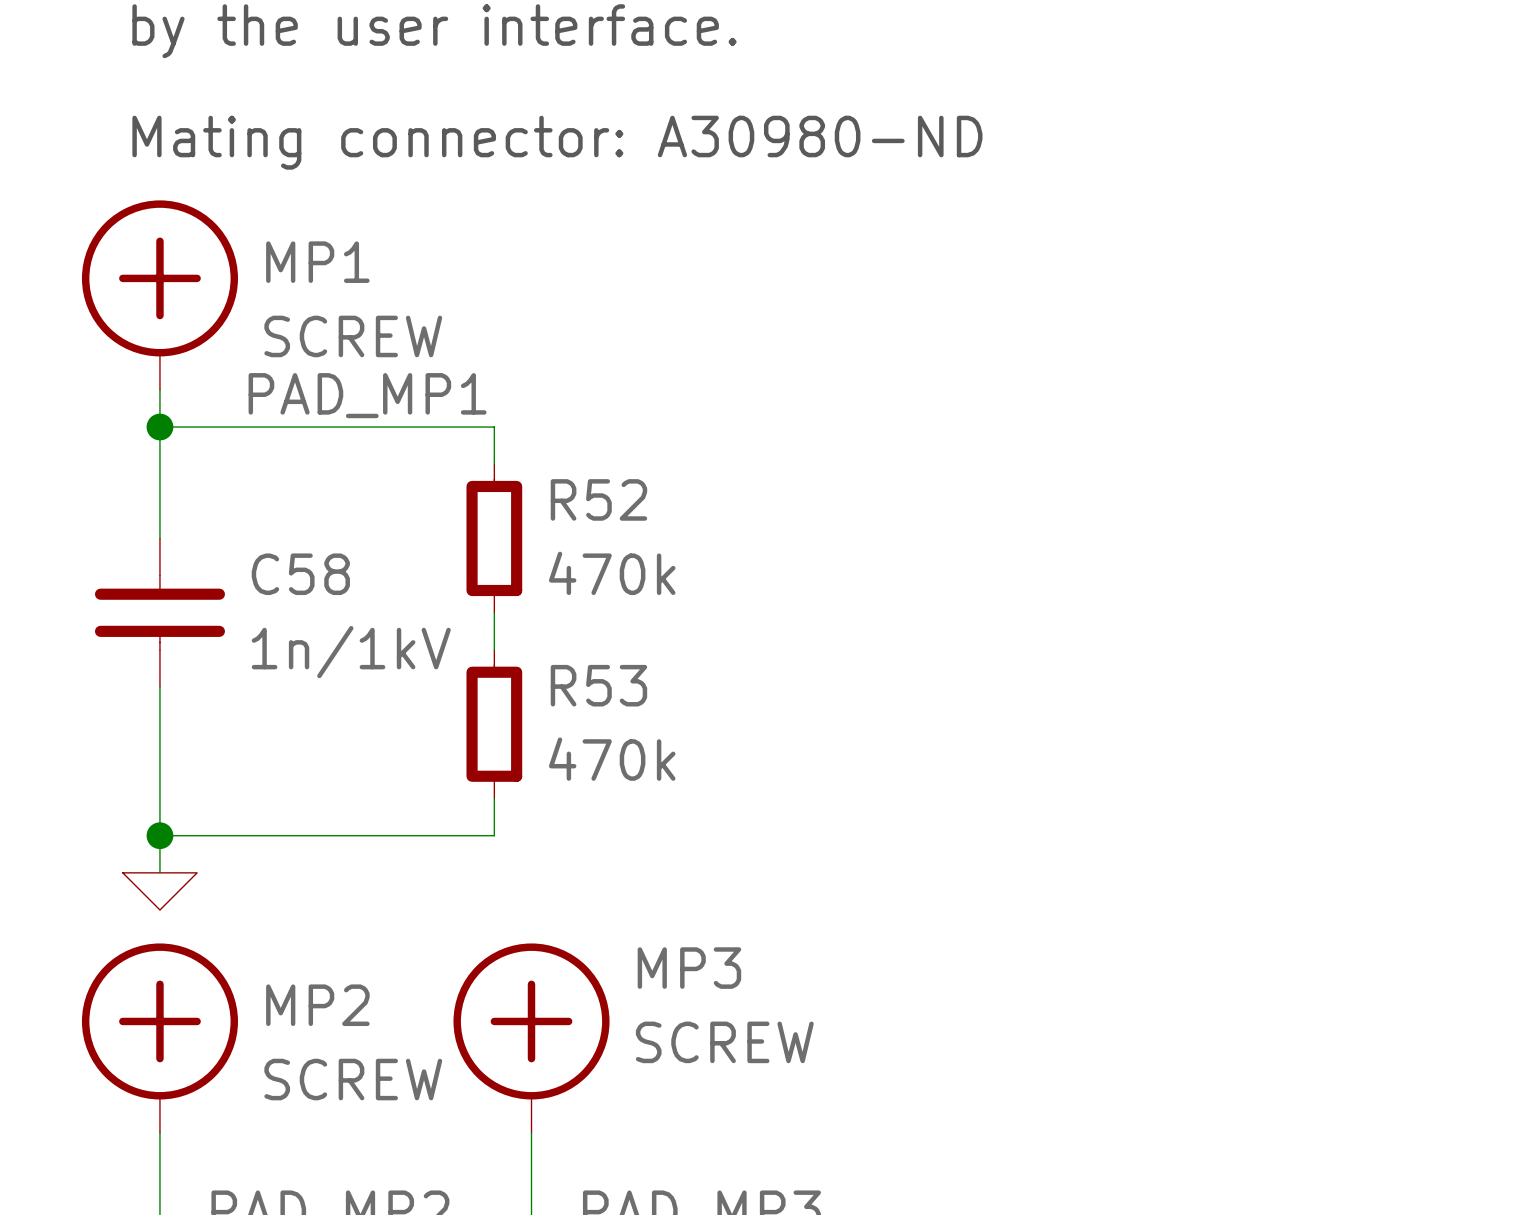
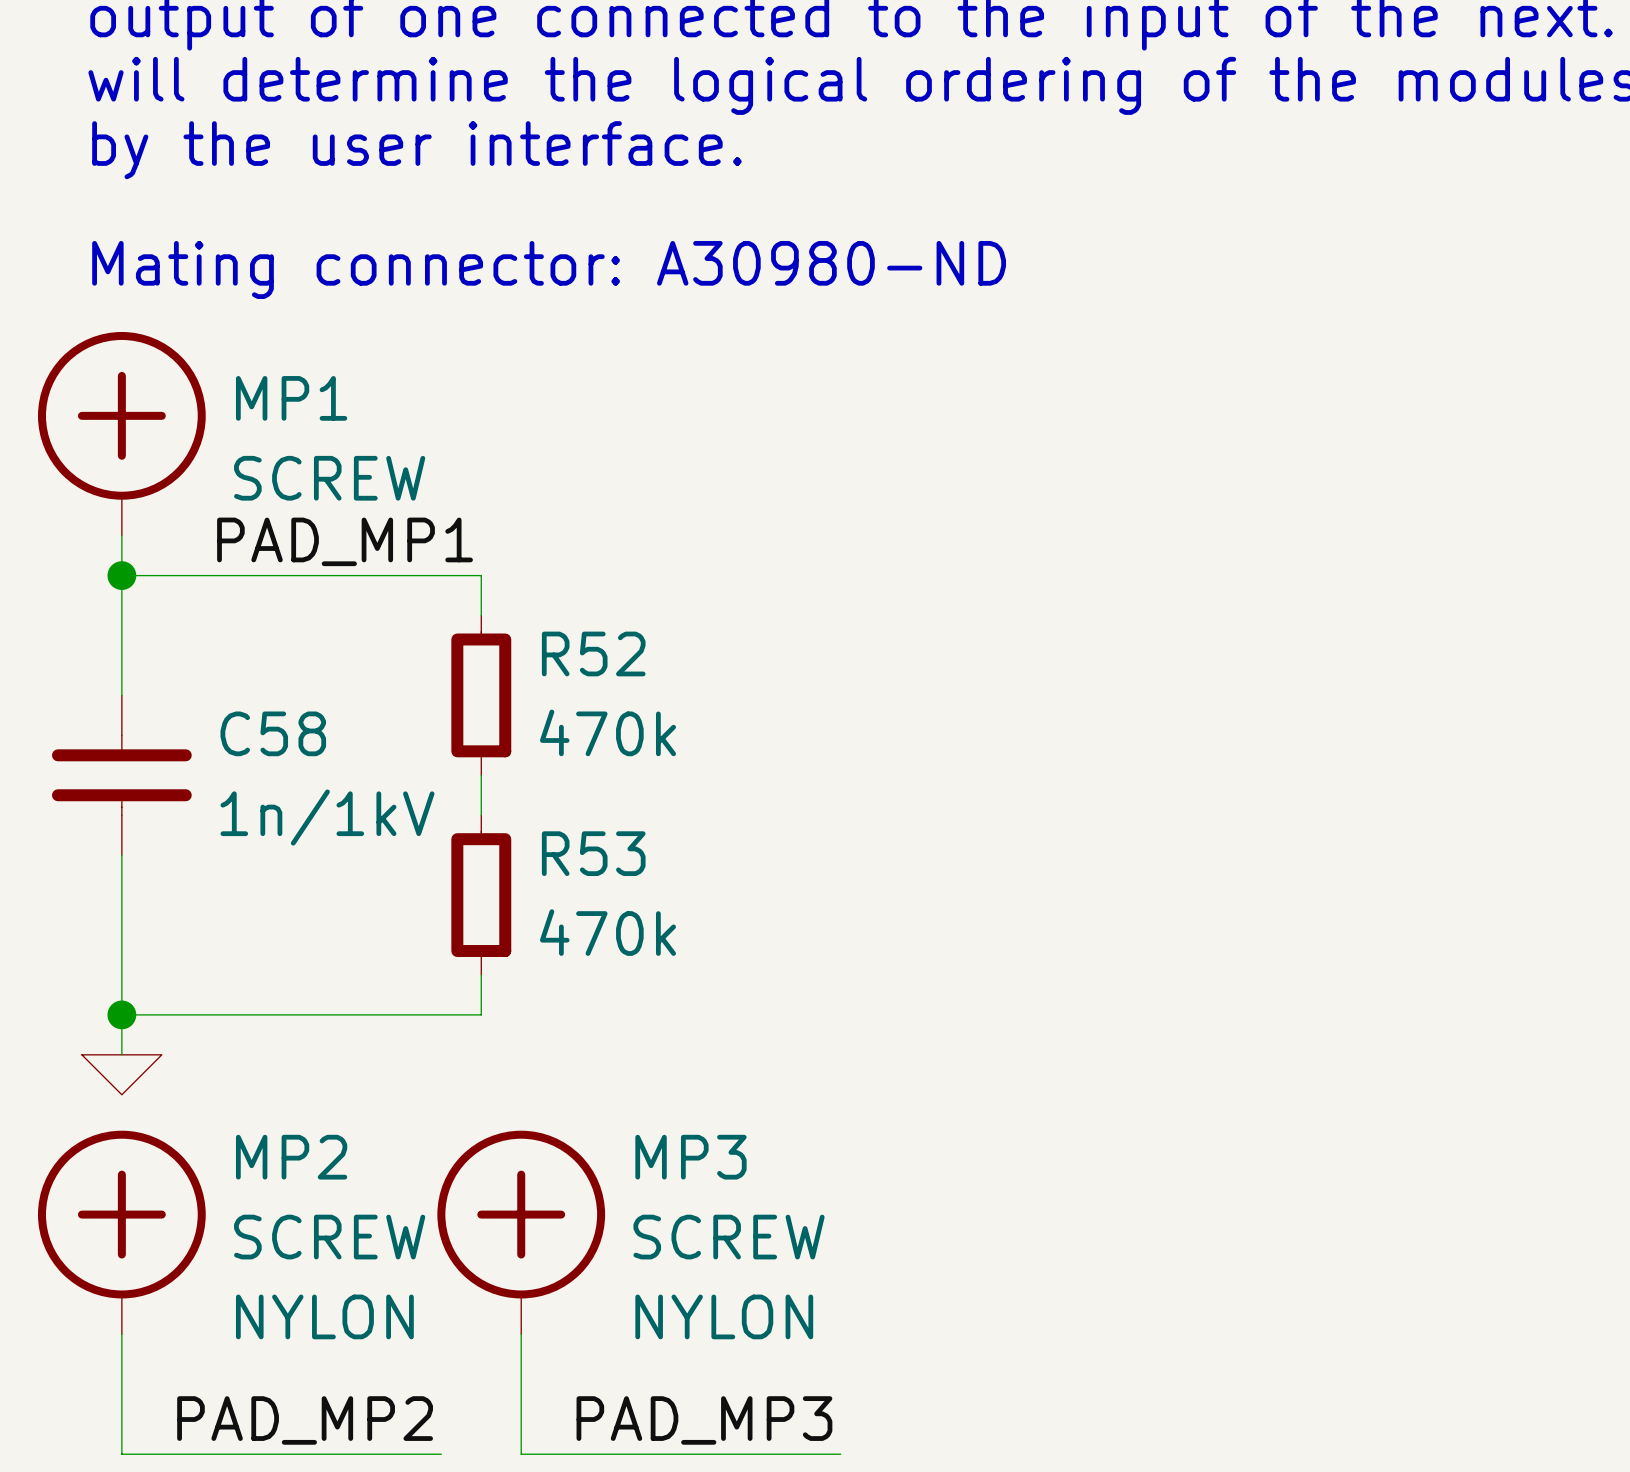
MP2 name position: MP2 (317, 1005) -> MP2 (291, 1157)
MP2 value position: SCREW (353, 1079) -> SCREW (329, 1237)
MP2 text: none -> NYLON (324, 1316)
MP3 text: none -> NYLON (724, 1316)

